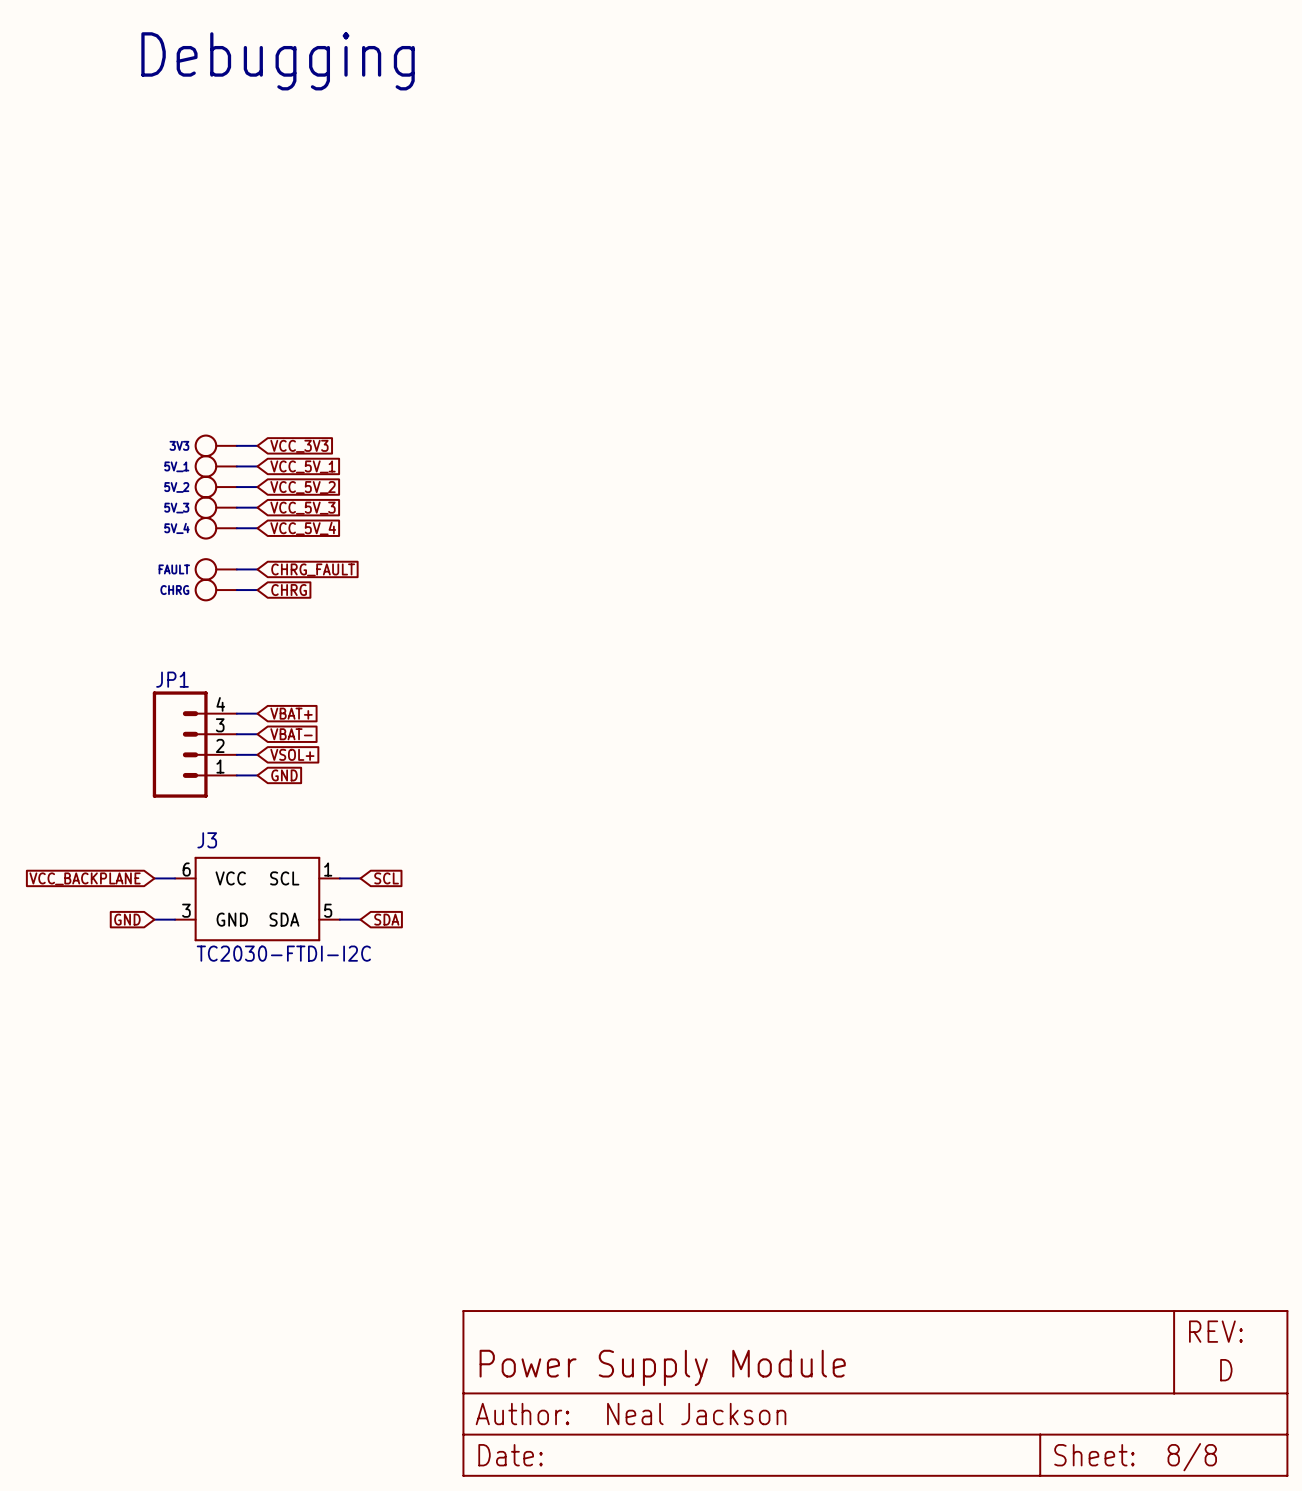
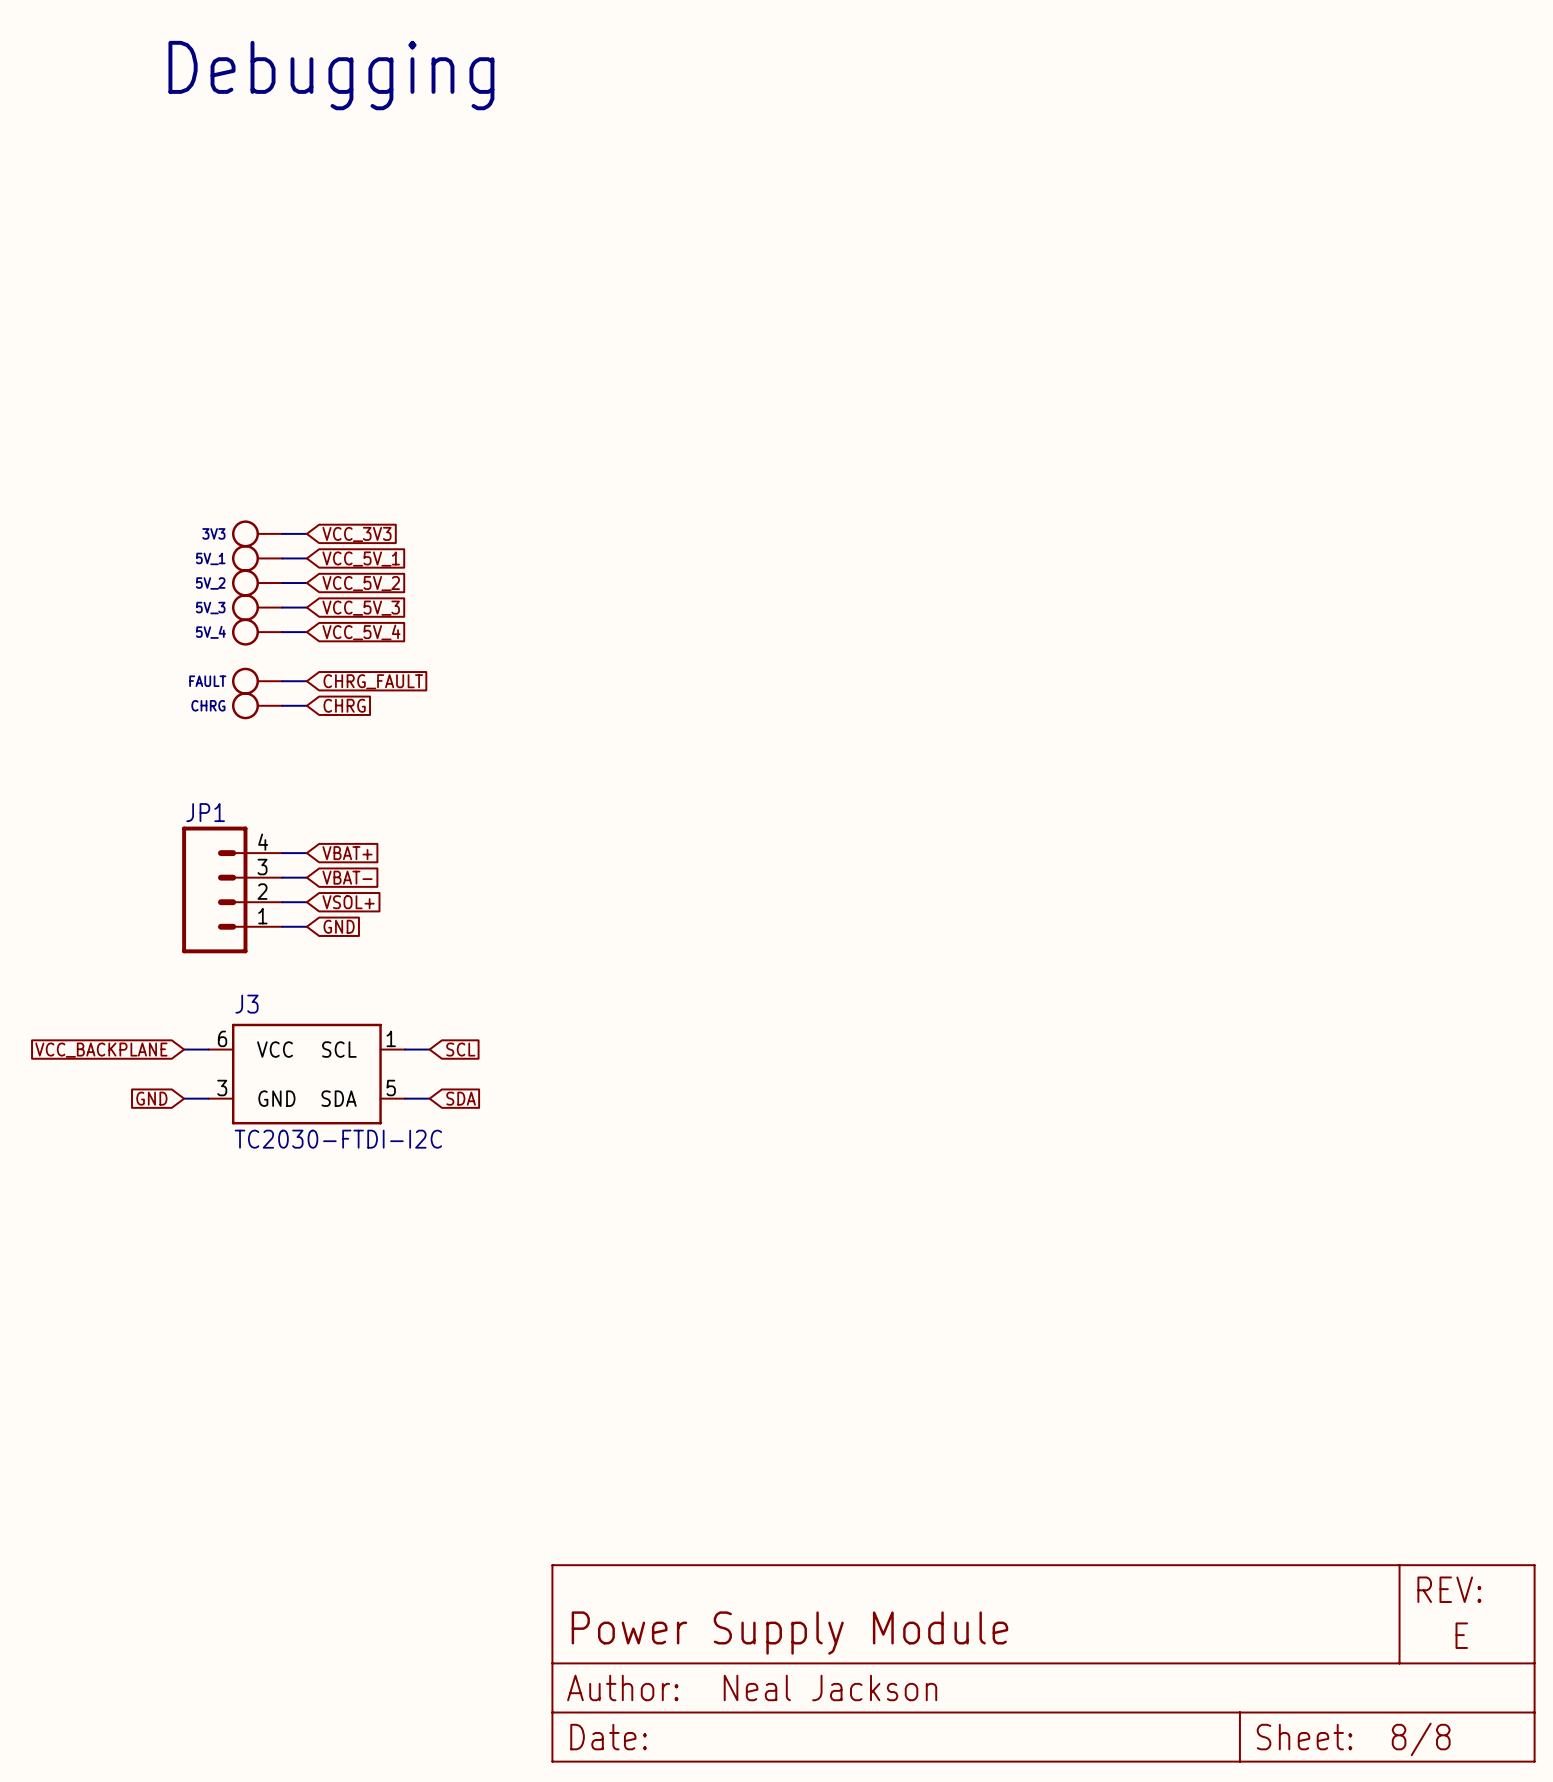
part text: D (1226, 1370) -> E (1461, 1635)

